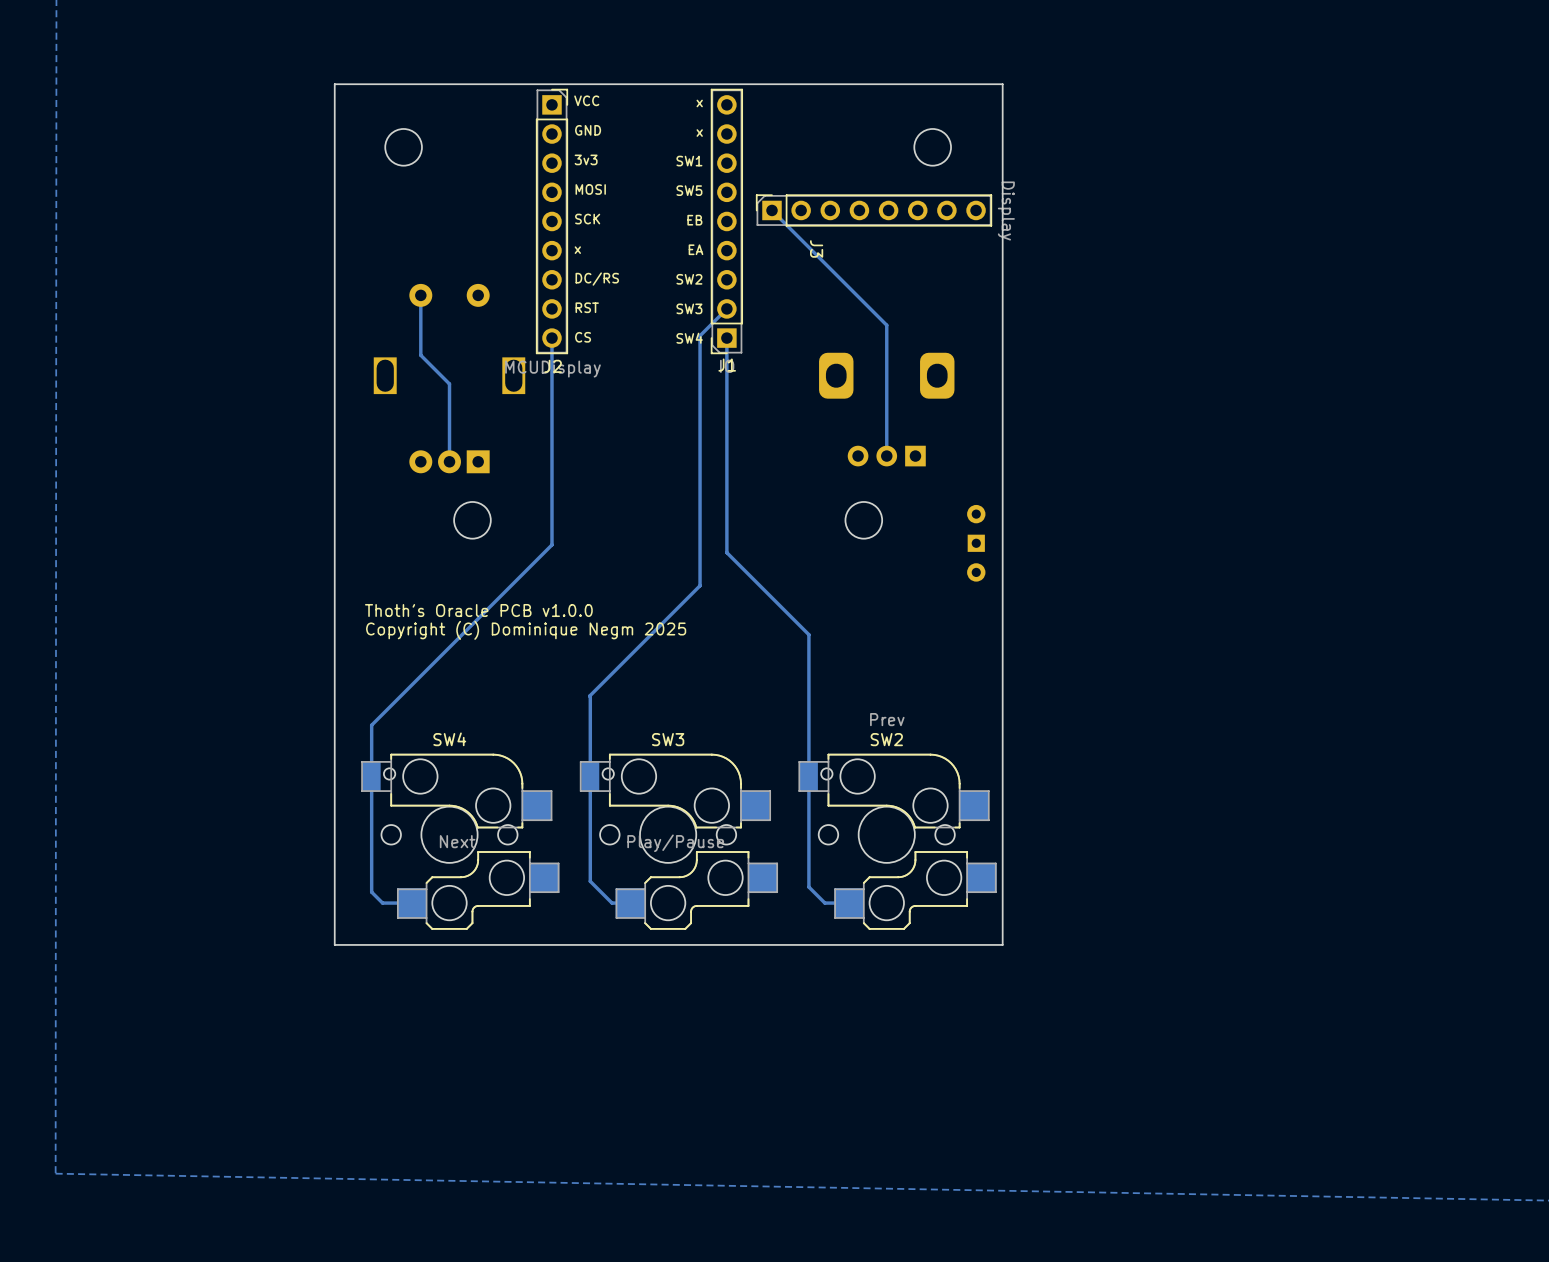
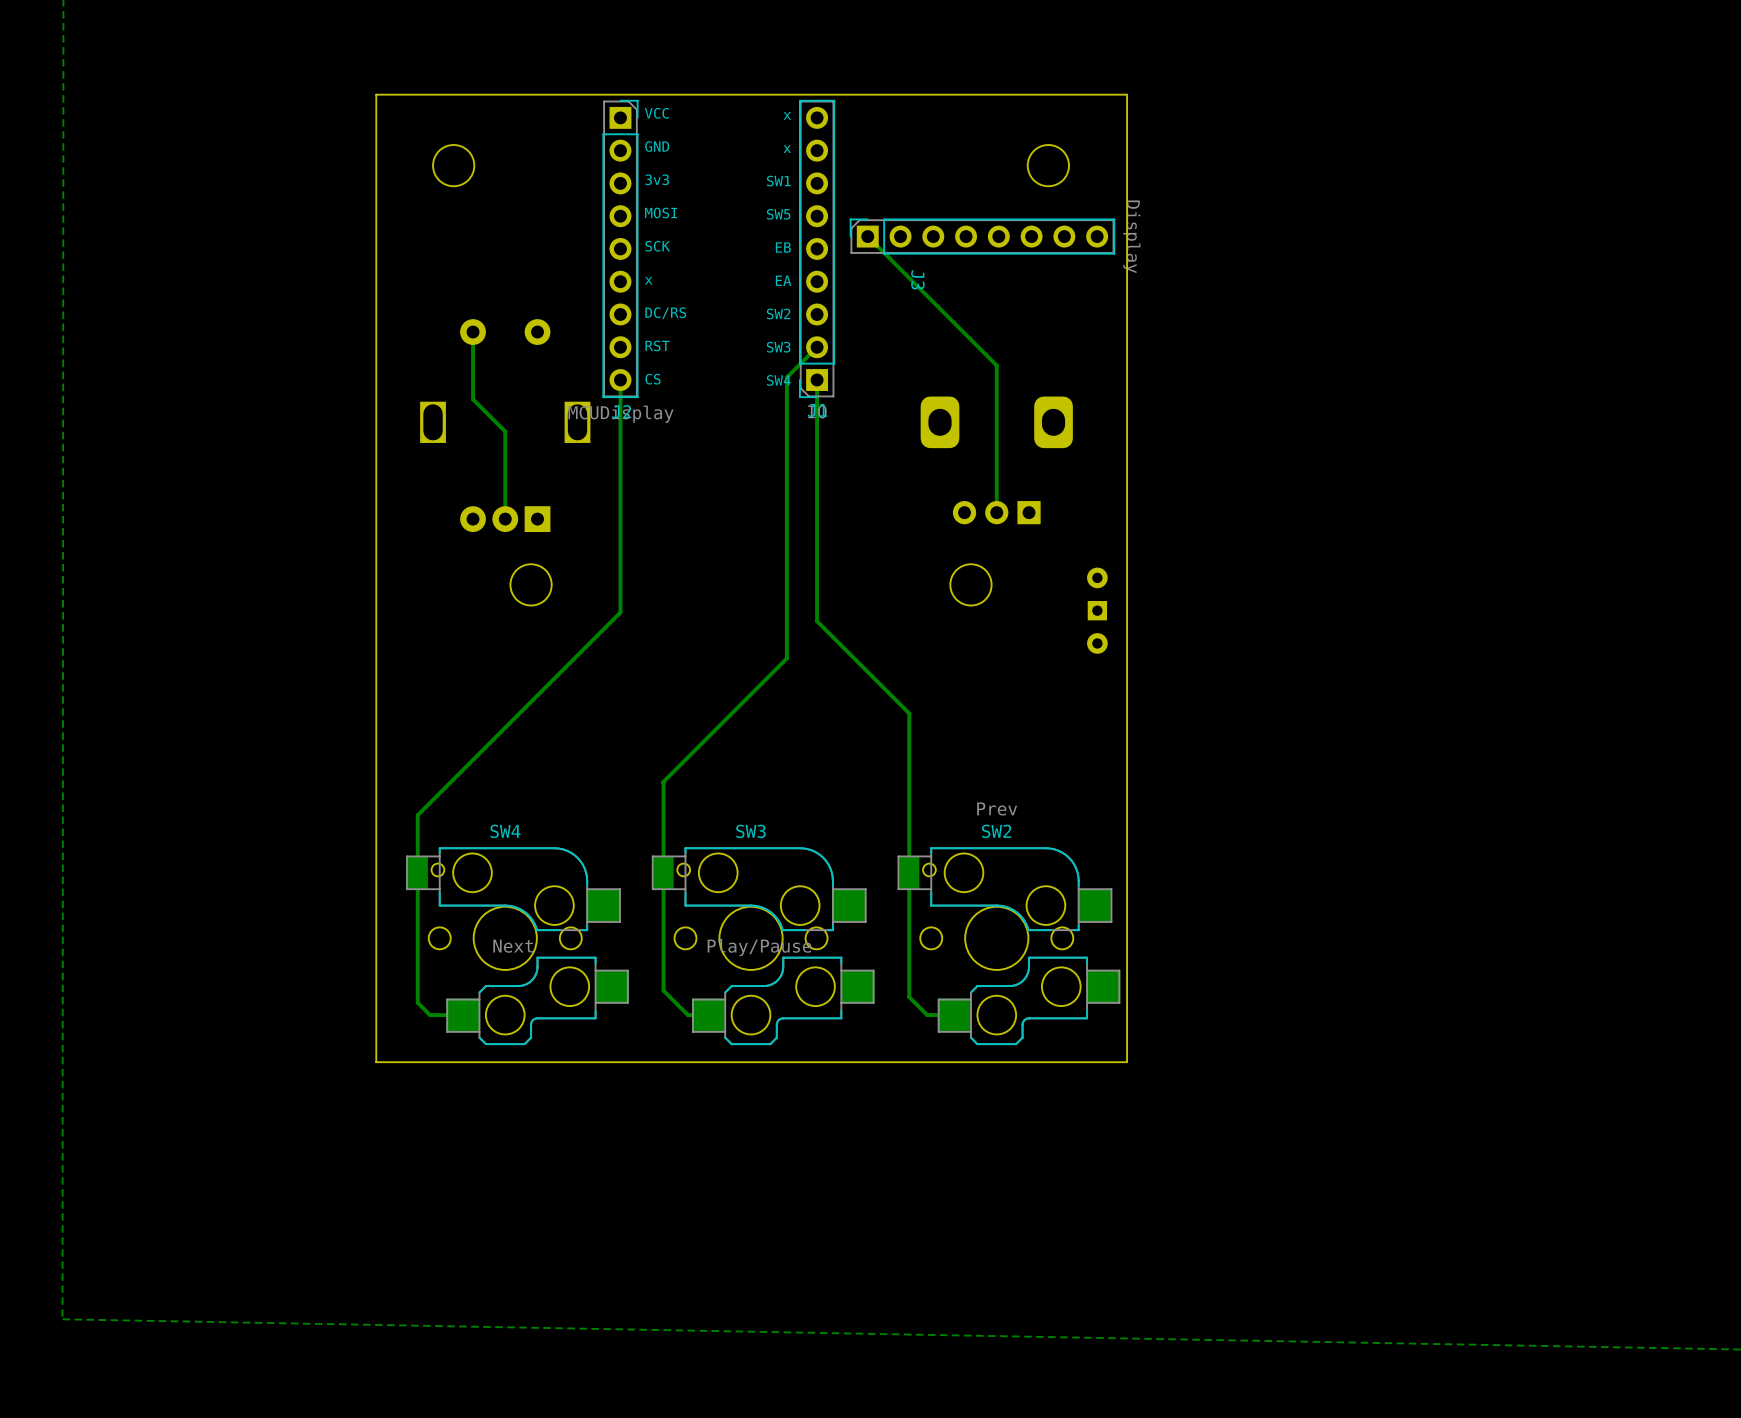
text: Thoth's Oracle PCB v1.0.0 (478, 610) -> none
text: Copyright (C) Dominique Negm 2025 (526, 630) -> none

